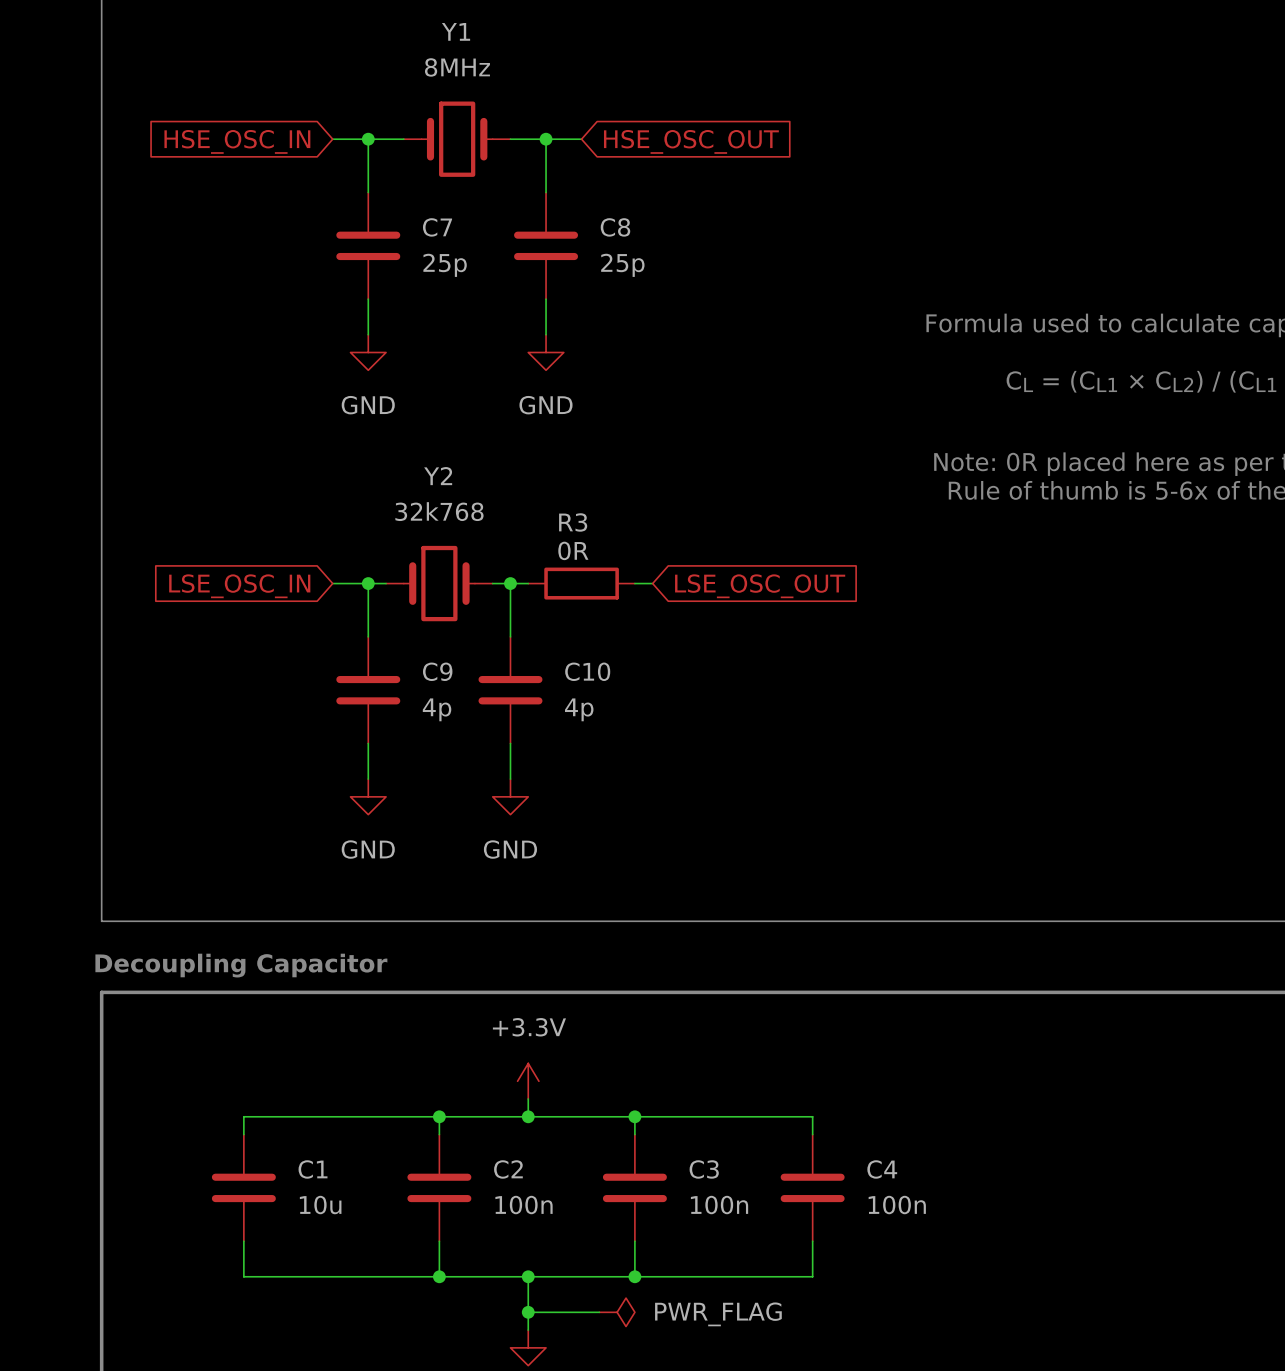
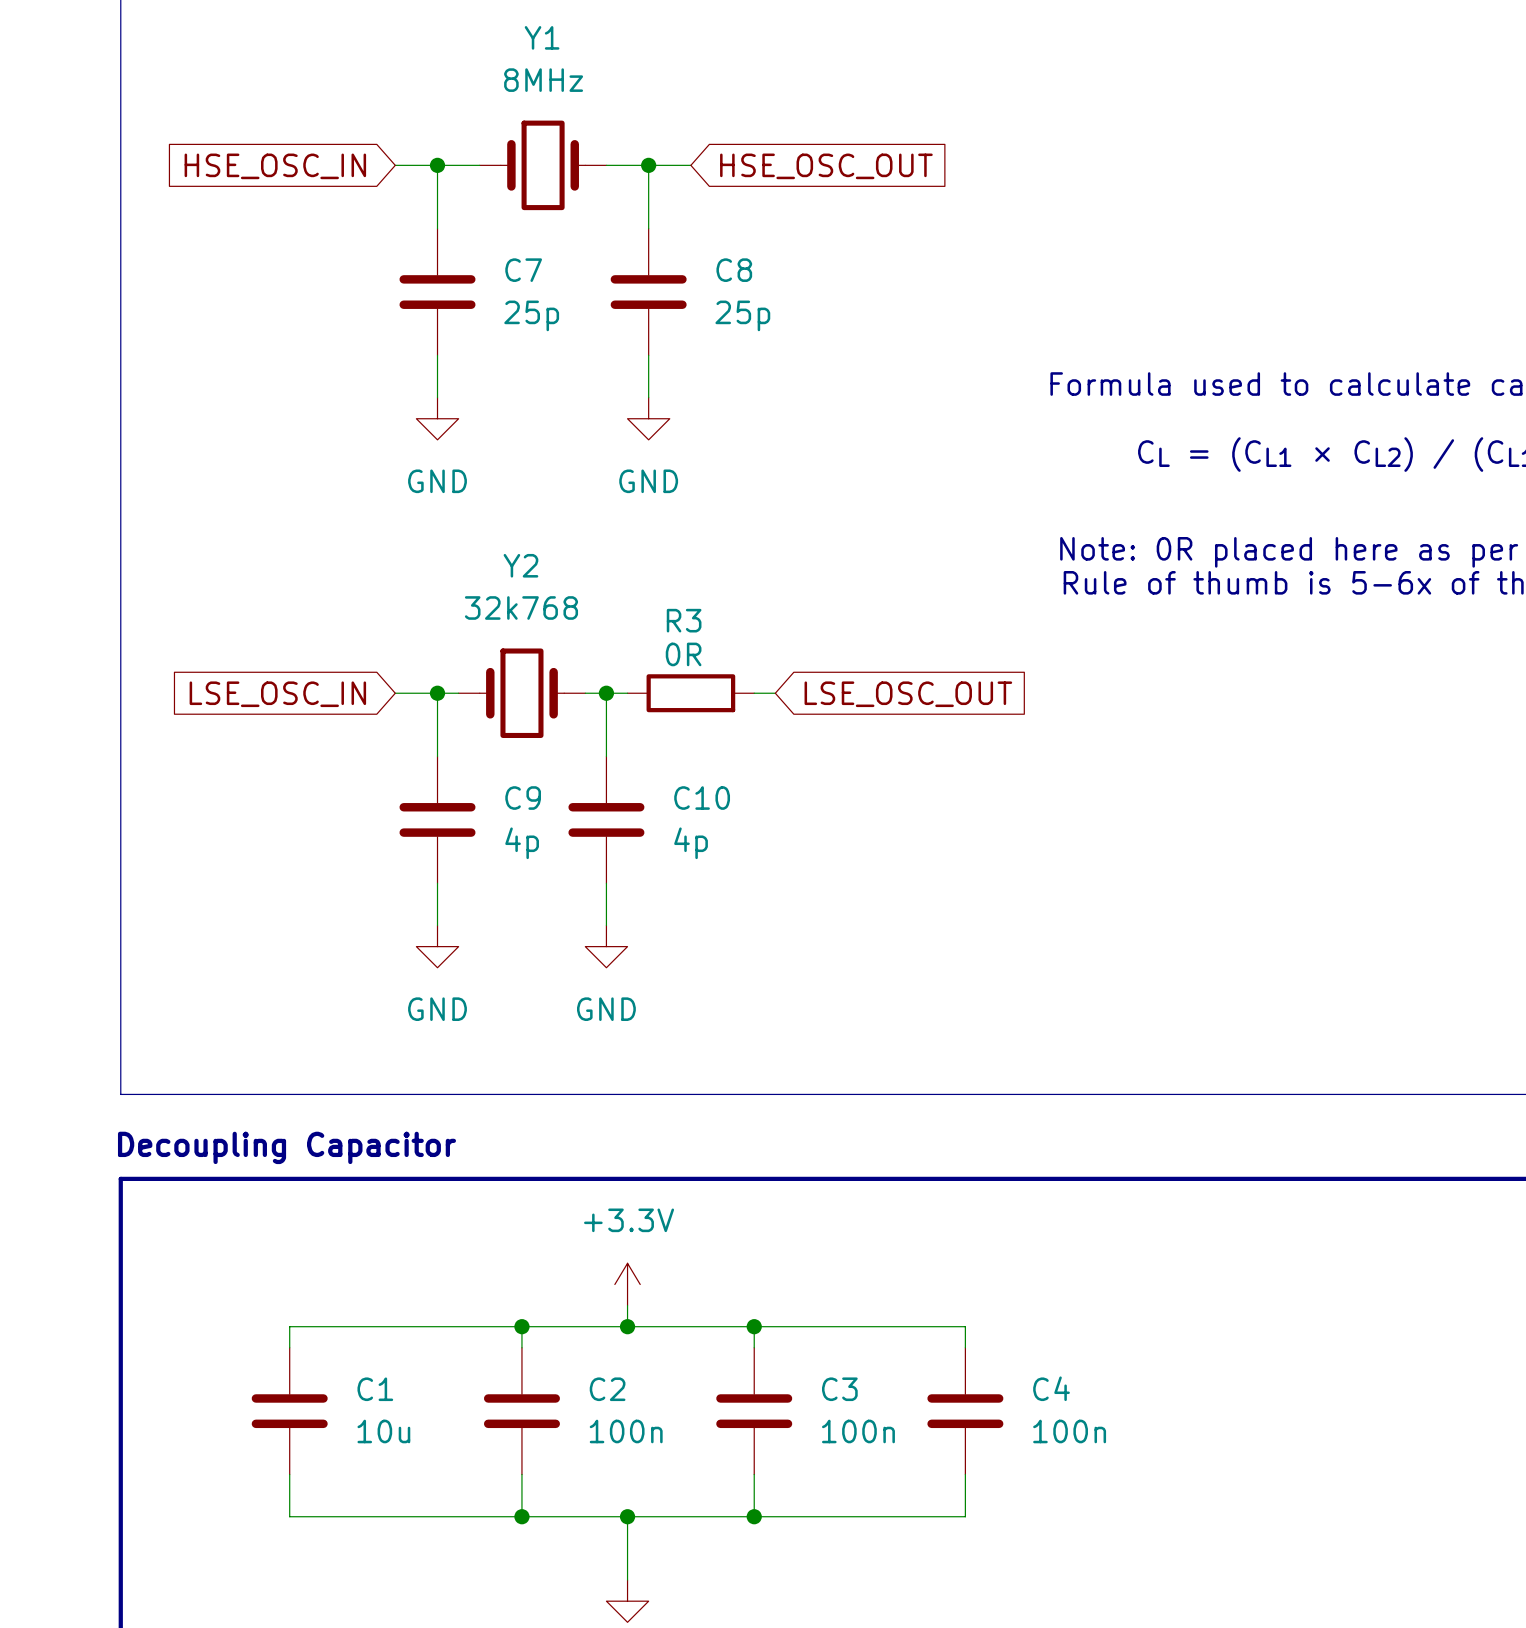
wire: (528, 1312) (599, 1312) -> none
junction: (528, 1312) -> none
power symbol: PWR_FLAG (617, 1312) -> none

